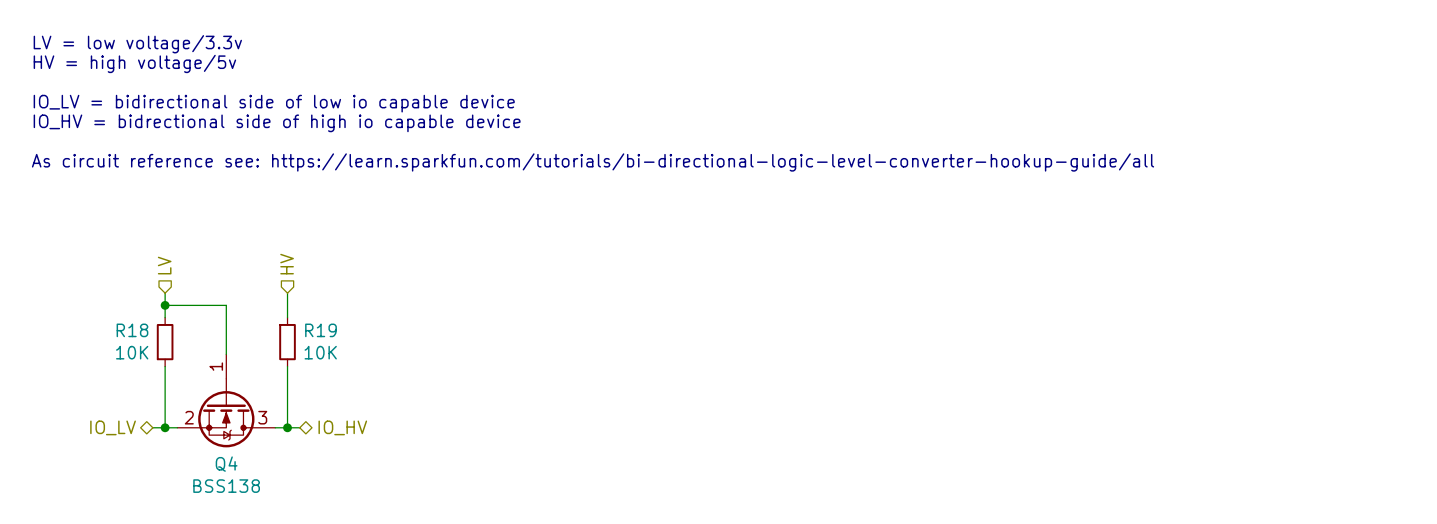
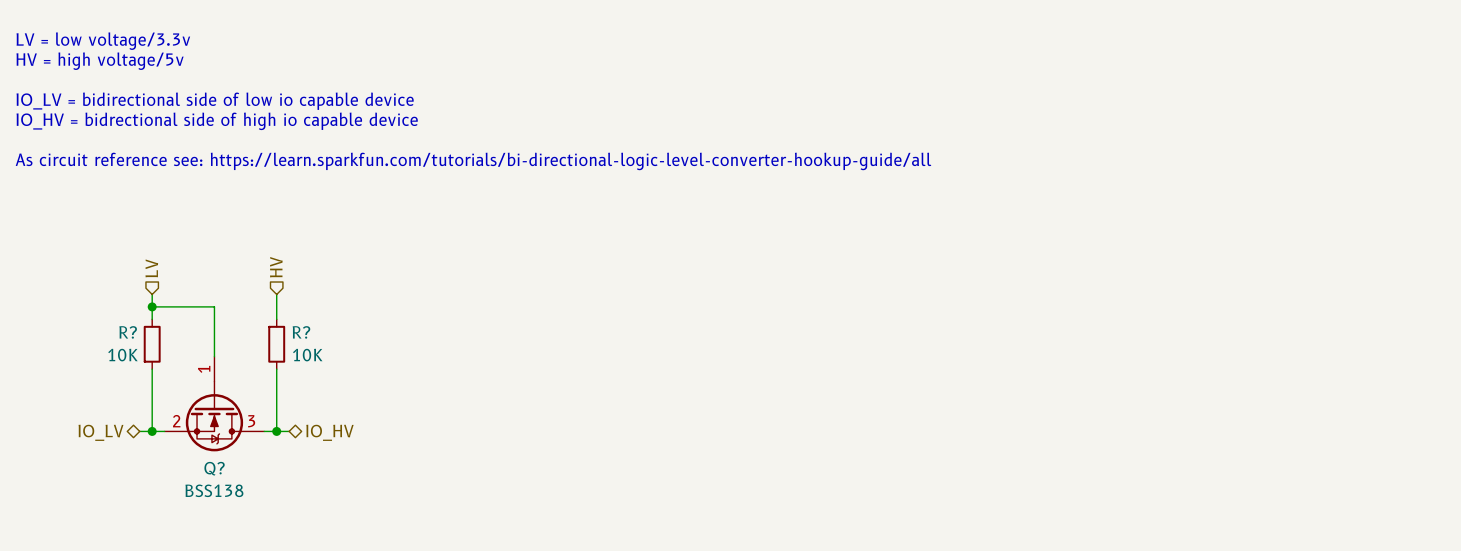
R18 name: R18 (132, 330) -> R? (128, 332)
R19 name: R19 (320, 330) -> R? (301, 332)
Q4 name: Q4 (226, 464) -> Q? (214, 468)

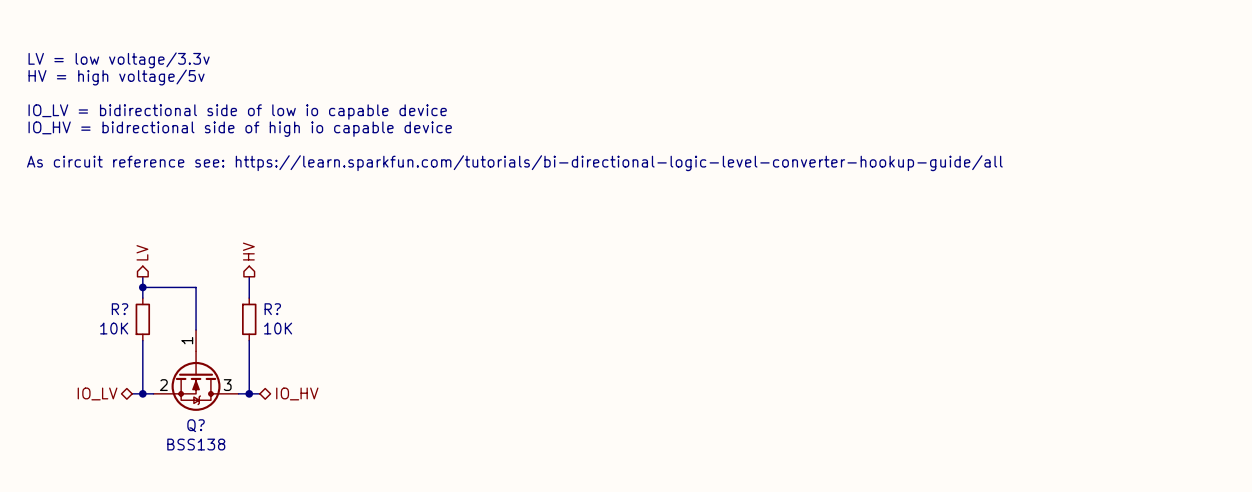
hierarchical label shape: input (276, 267) -> output (248, 251)
hierarchical label shape: input (151, 268) -> output (142, 252)

